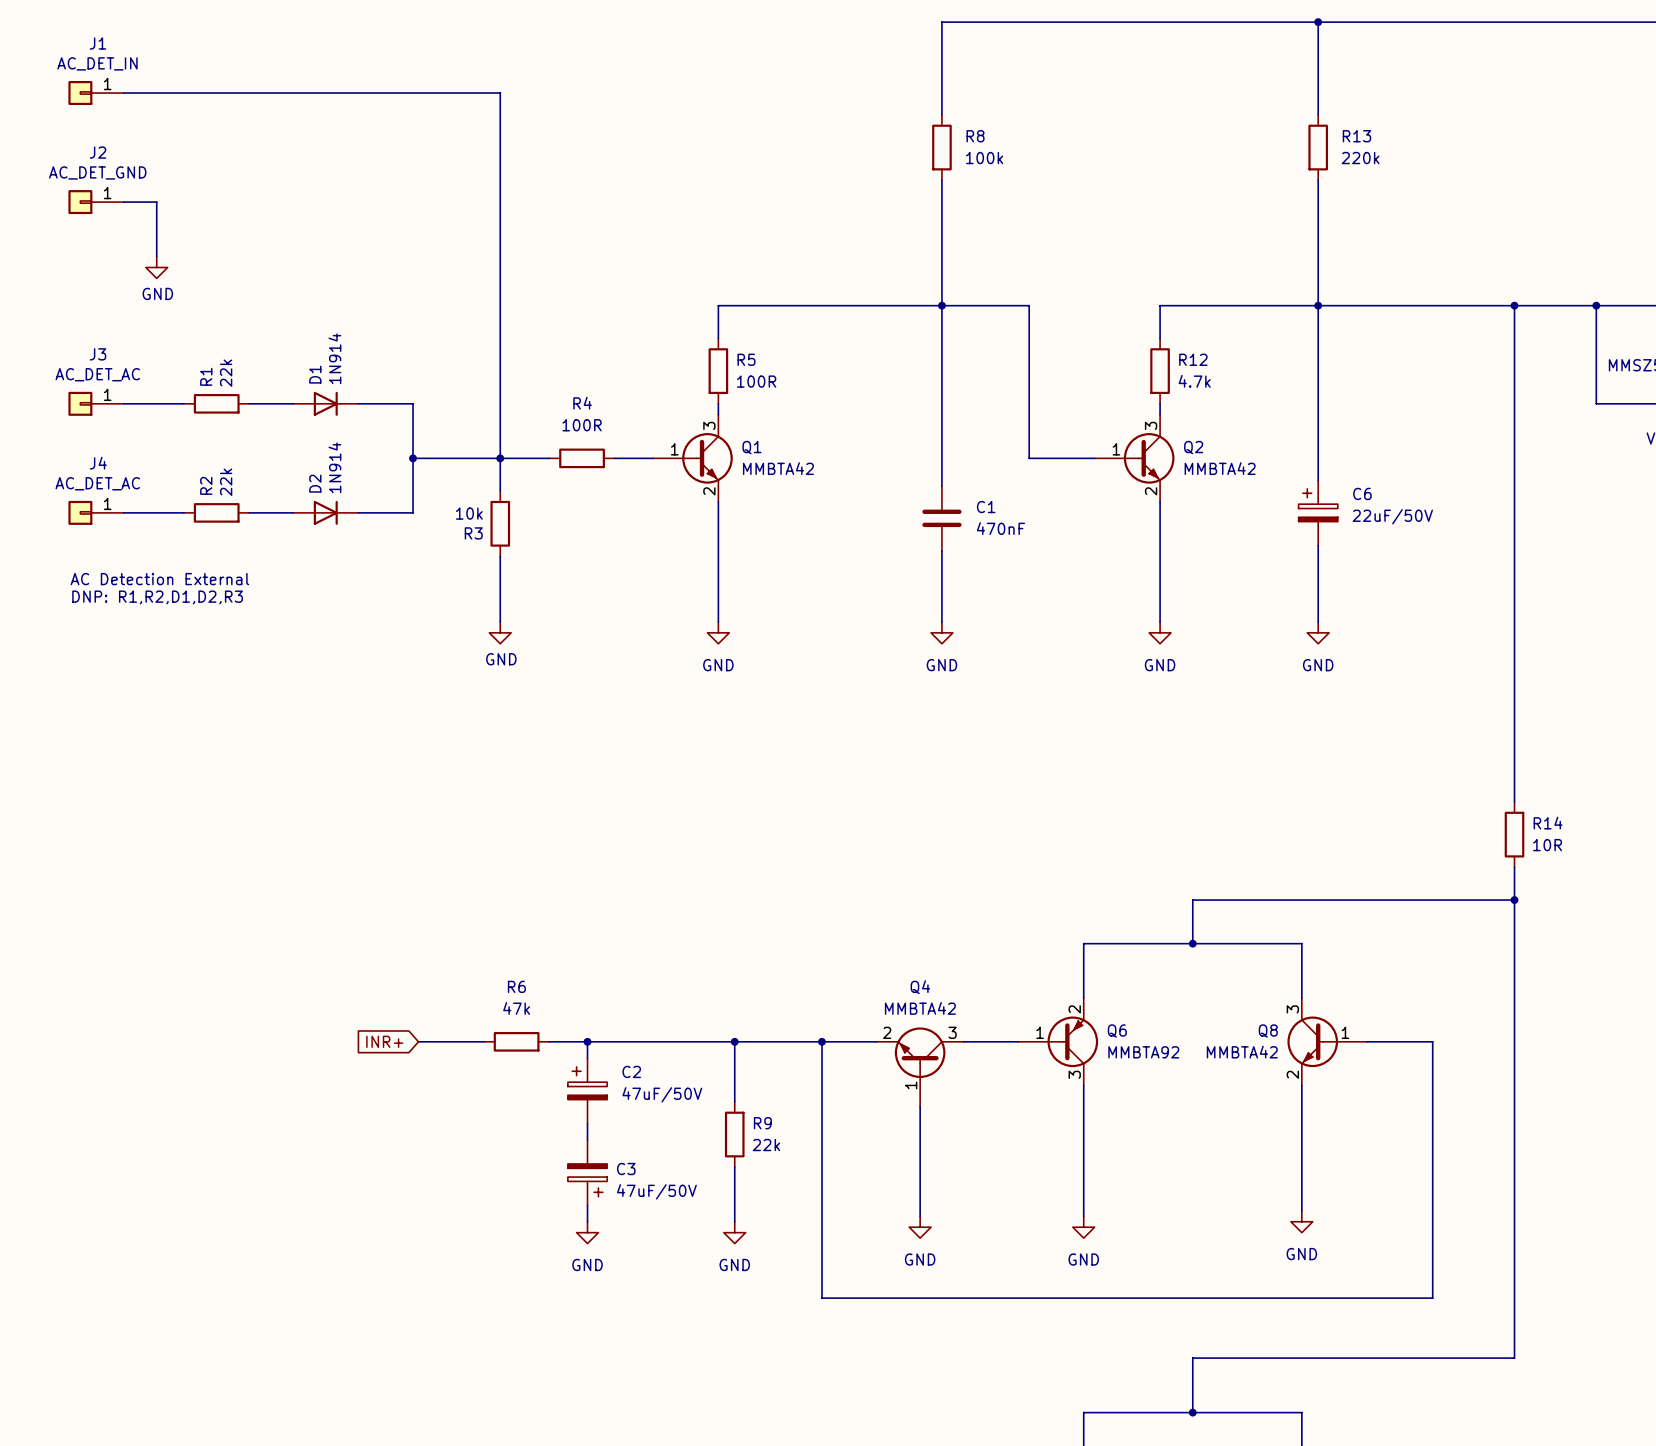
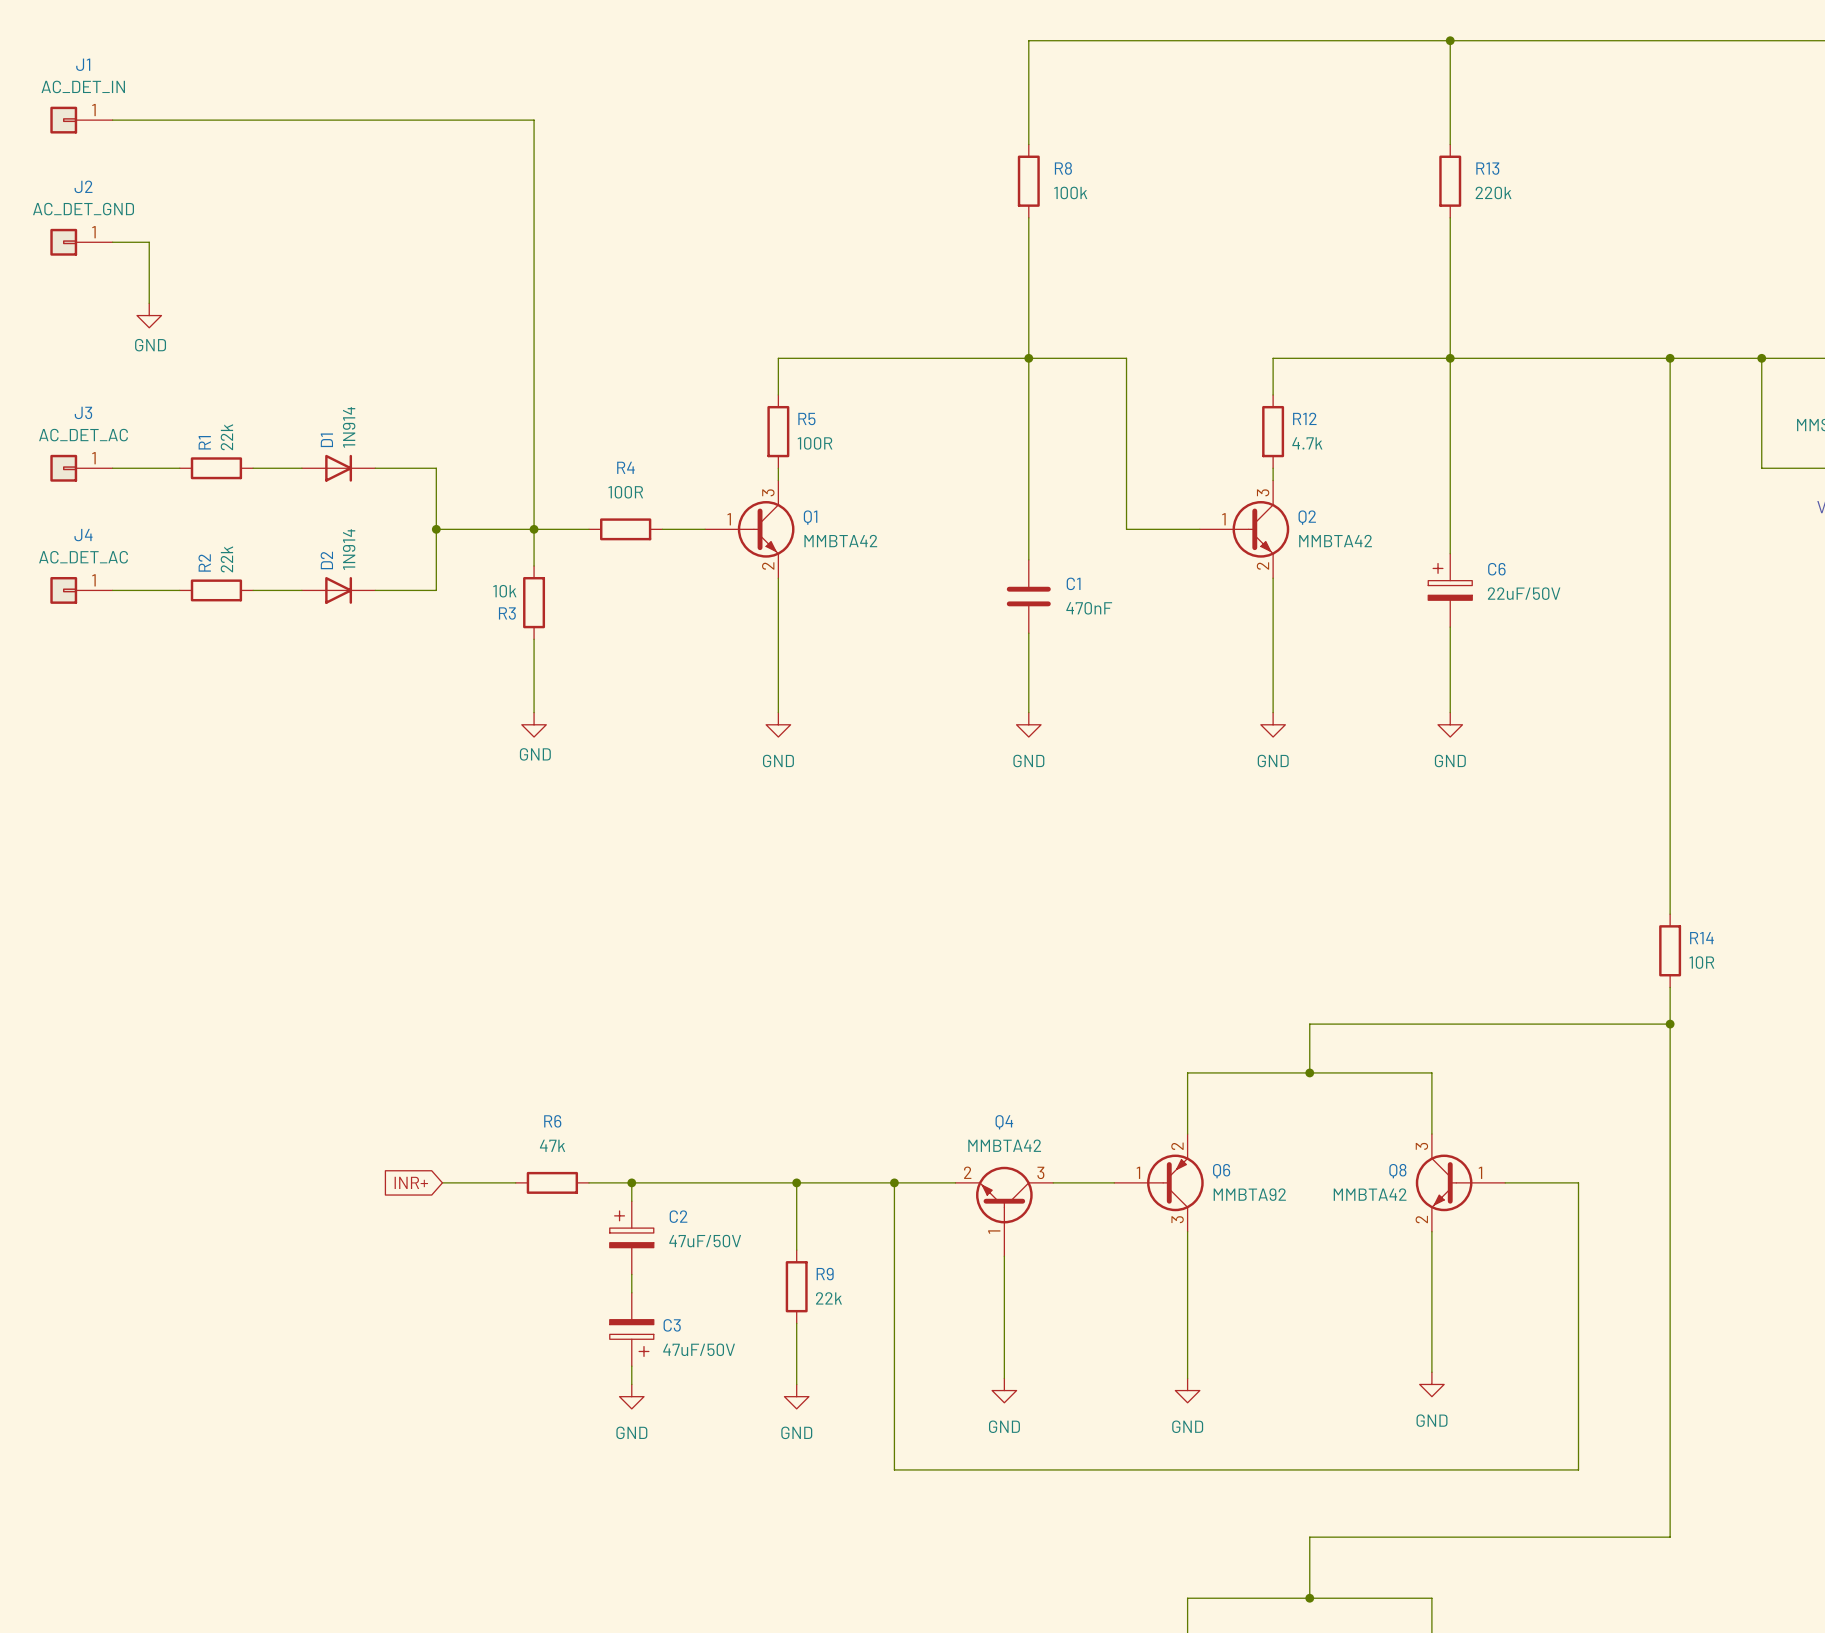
text: AC Detection External (159, 579) -> none
text: DNP: R1,R2,D1,D2,R3 (157, 597) -> none

